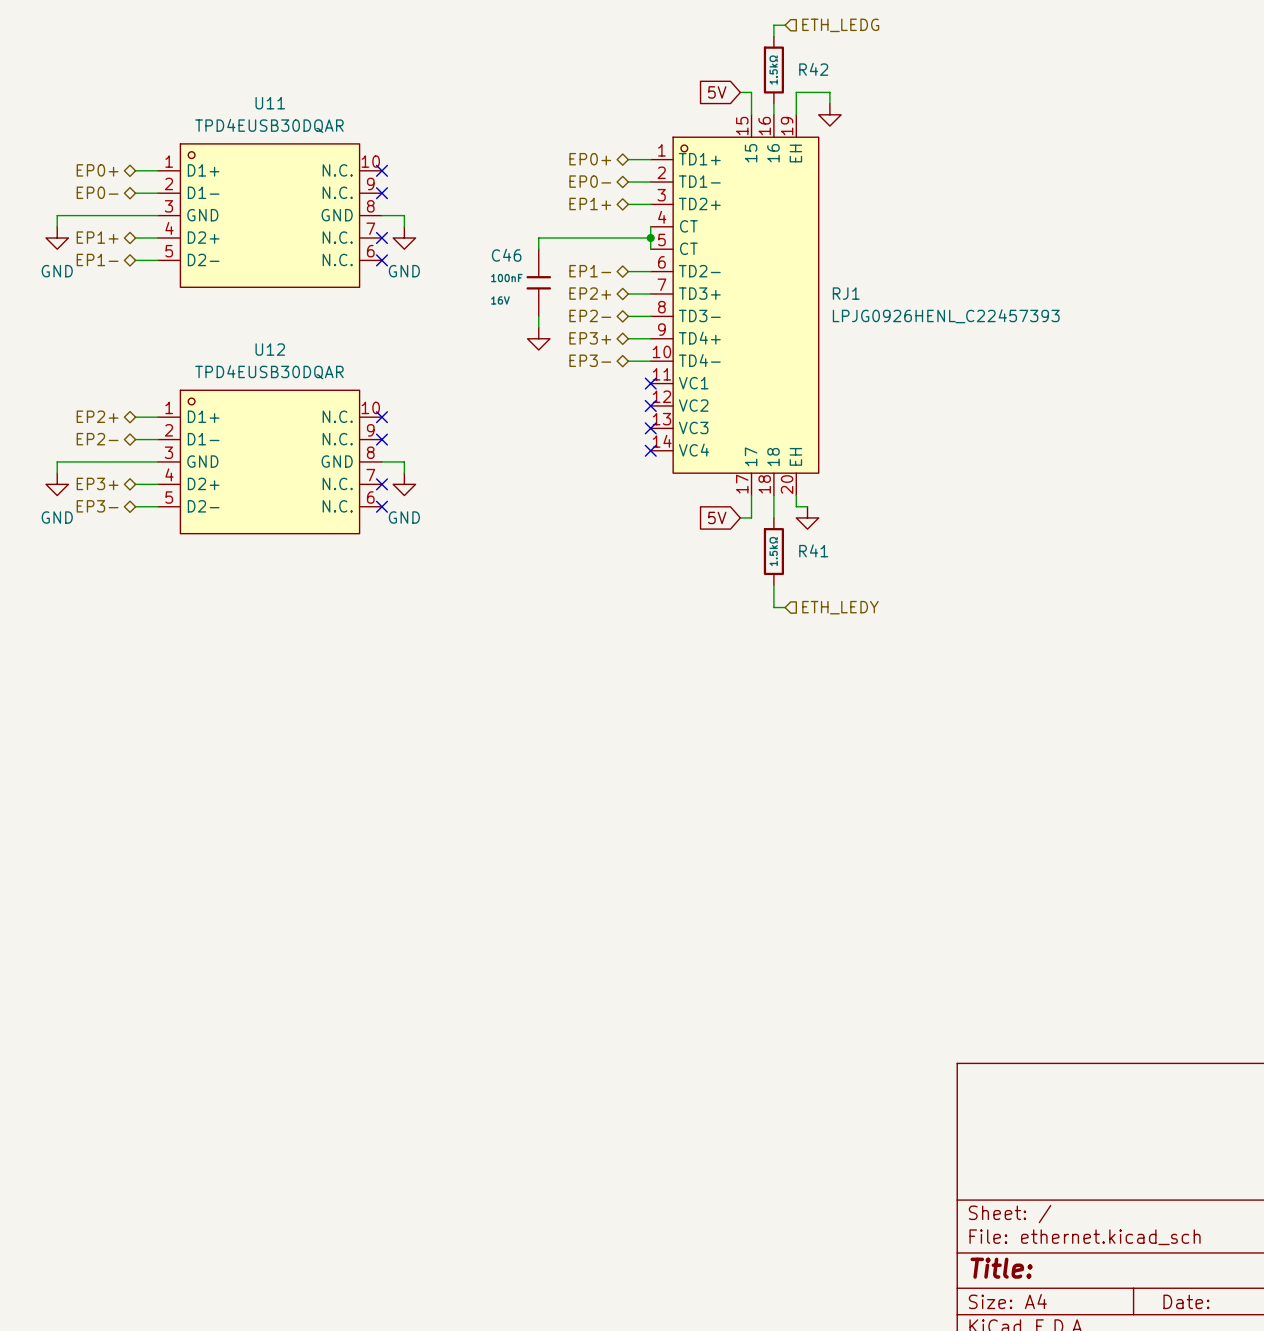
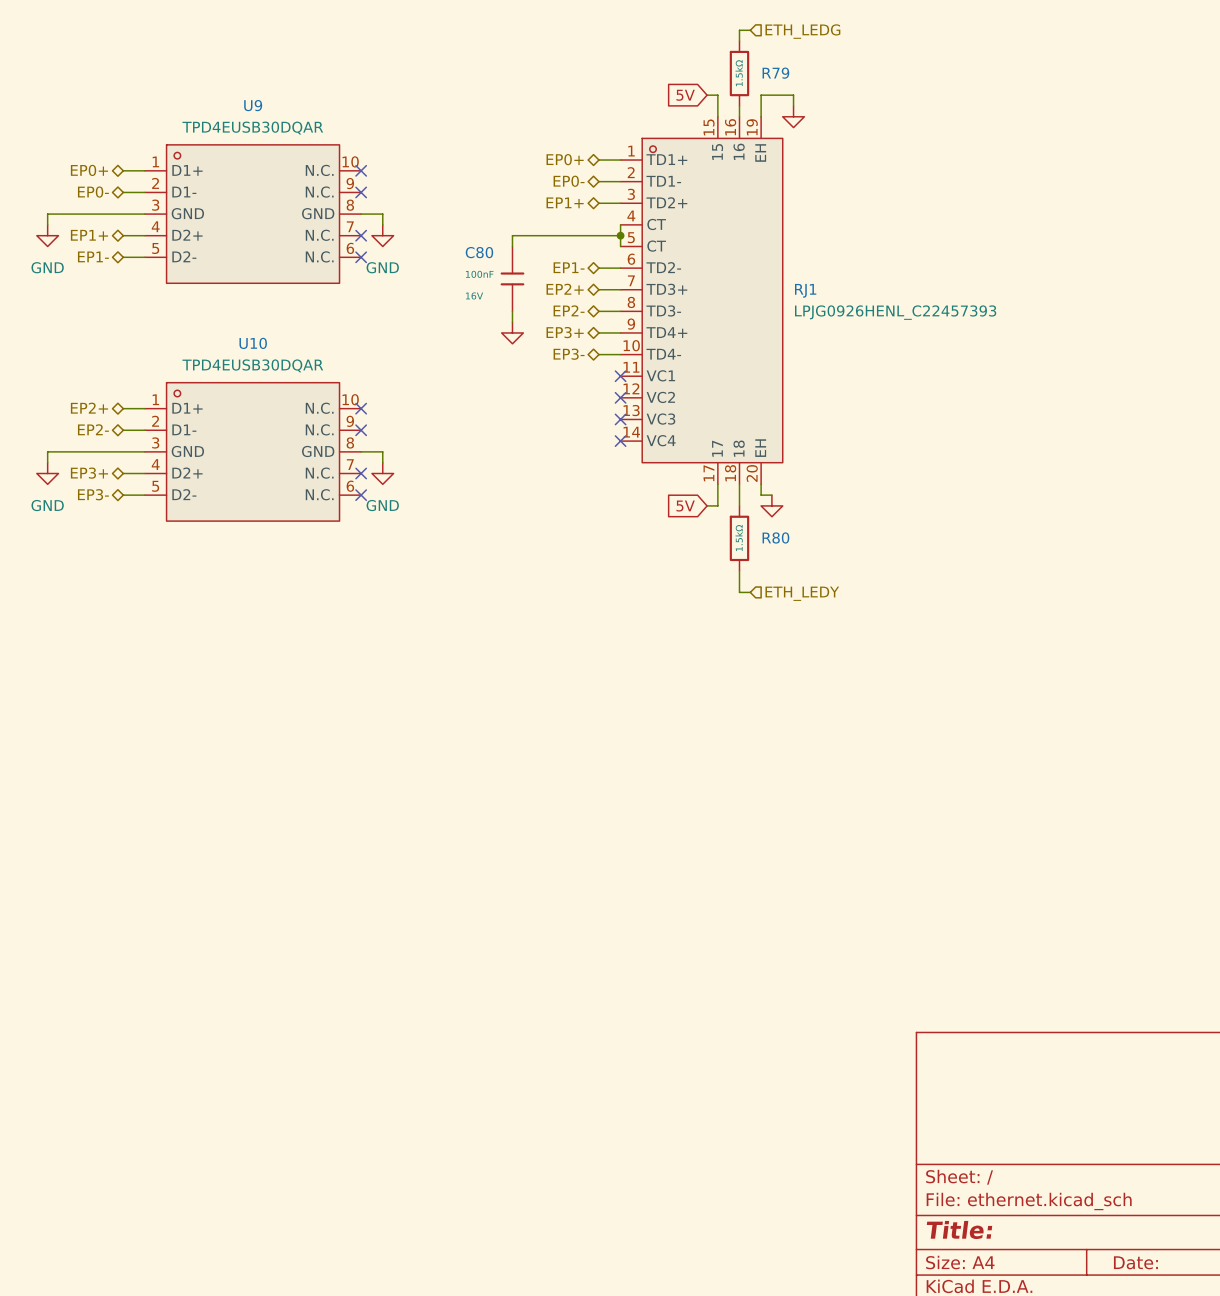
R42 name: R42 (813, 69) -> R79 (775, 73)
U11 name: U11 (270, 103) -> U9 (253, 105)
C46 name: C46 (506, 255) -> C80 (479, 252)
U12 name: U12 (270, 349) -> U10 (253, 343)
R41 name: R41 (813, 550) -> R80 (775, 537)

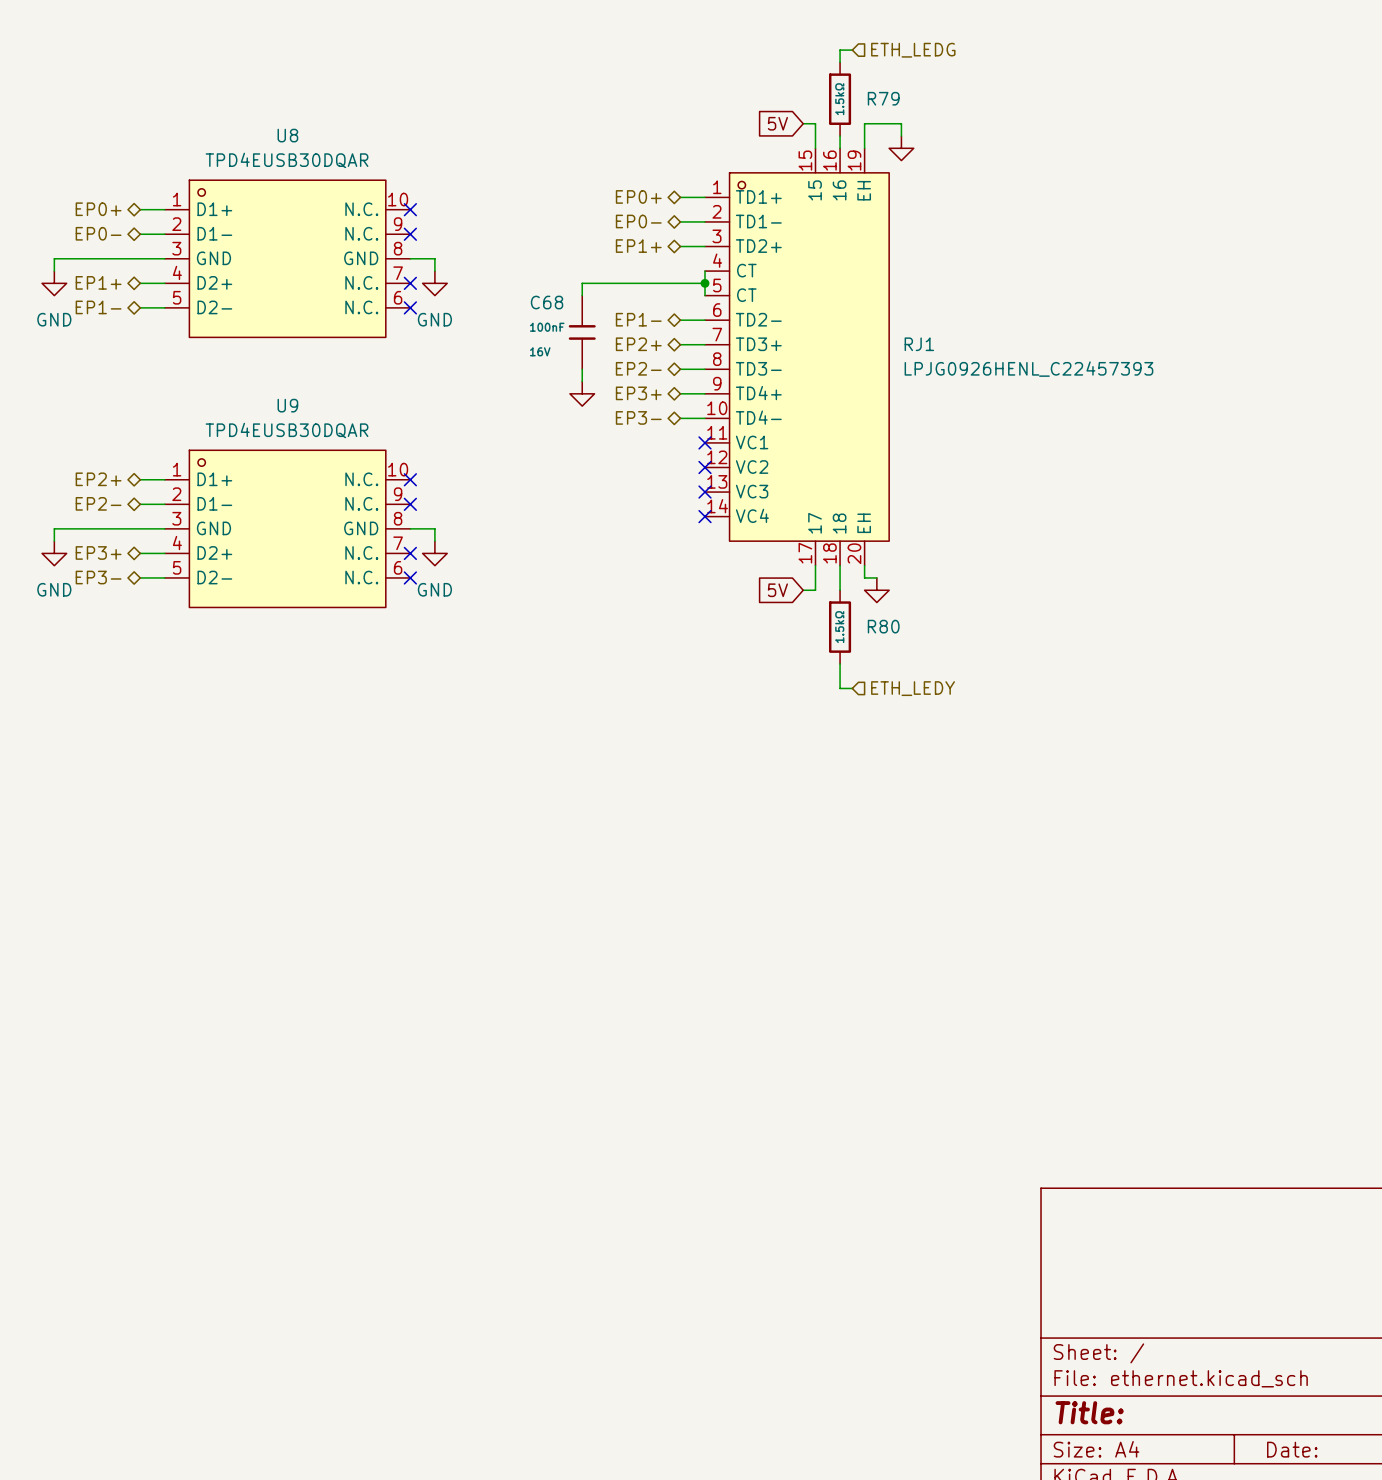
U9 name: U9 (253, 105) -> U8 (287, 135)
C80 name: C80 (479, 252) -> C68 (547, 302)
U10 name: U10 (253, 343) -> U9 (287, 405)

